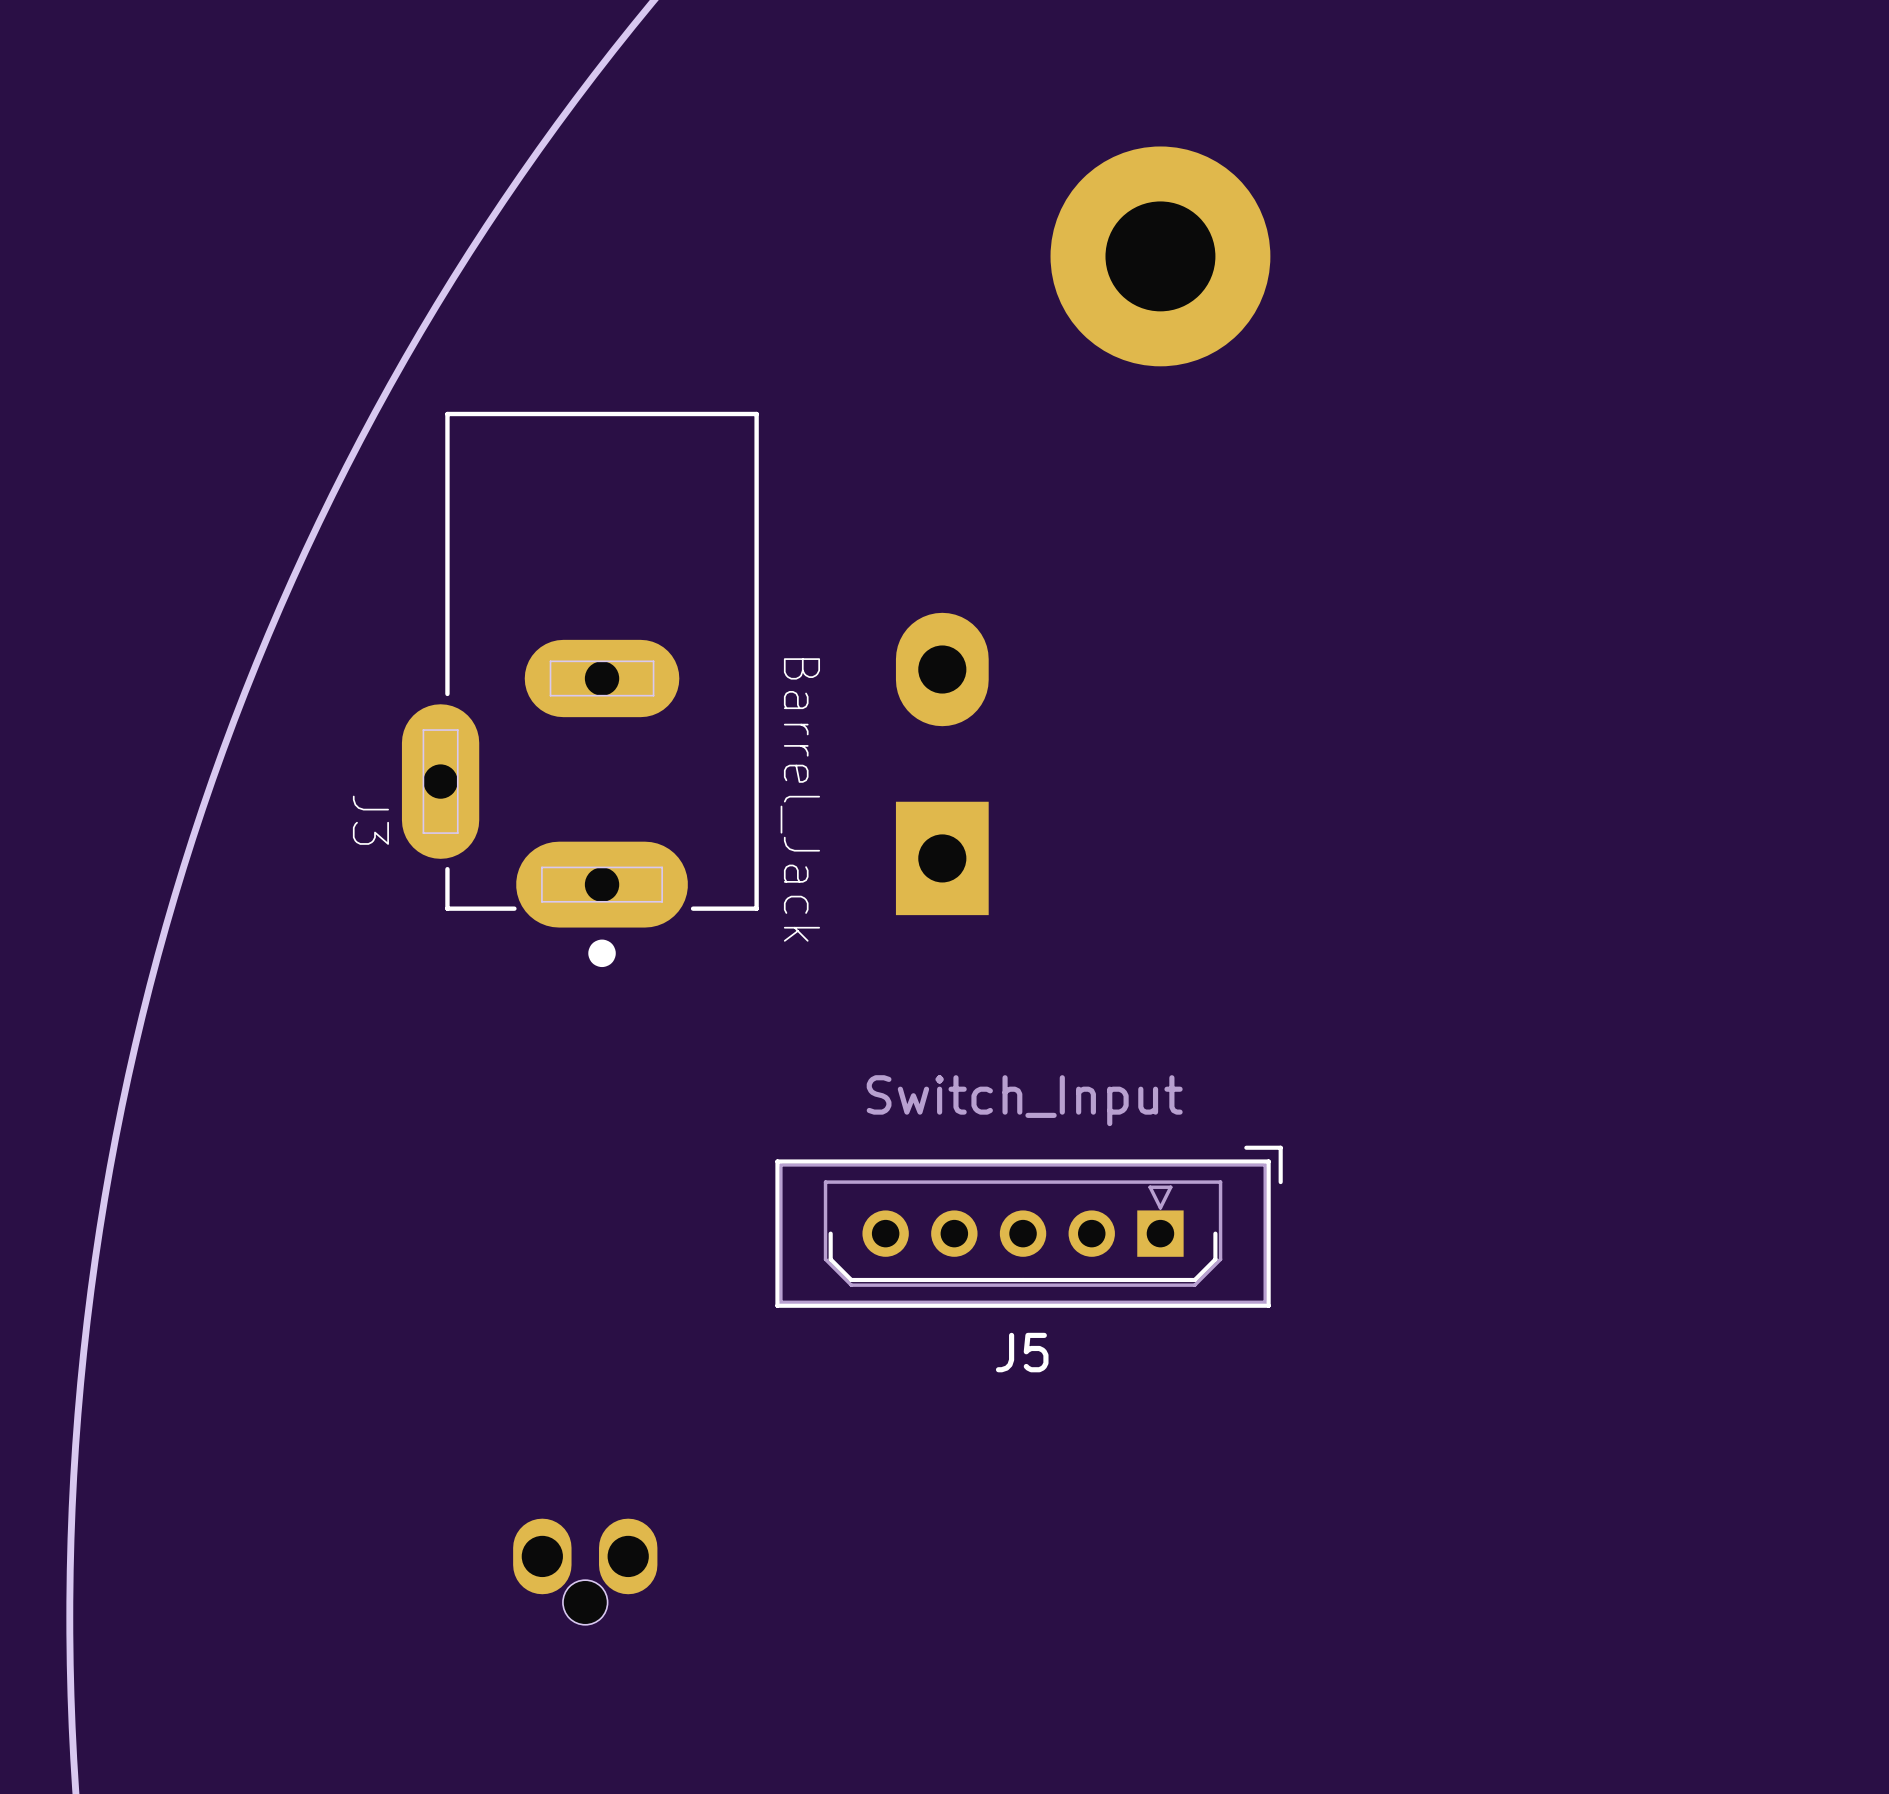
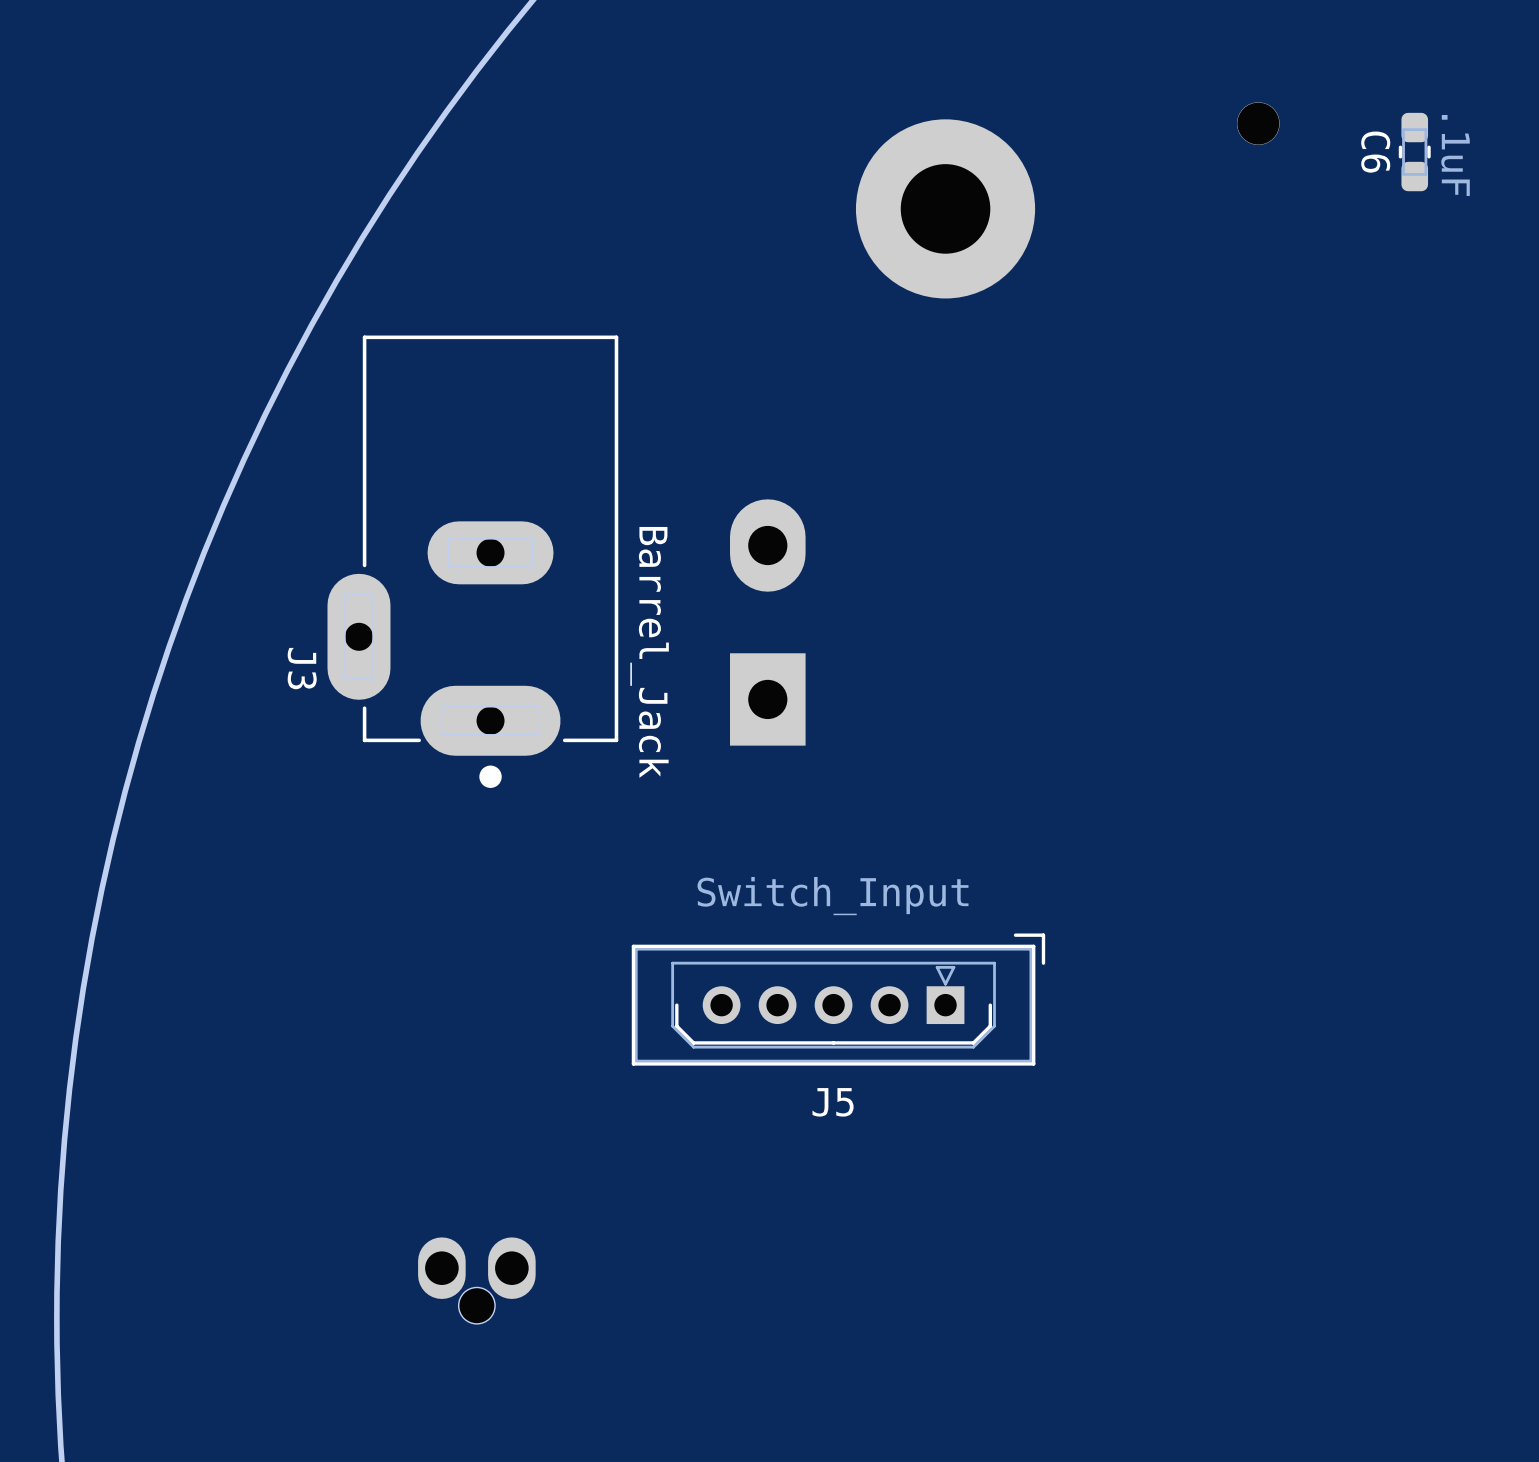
part: none -> (1258, 123)
C6: none -> .1uF (1414, 152)

